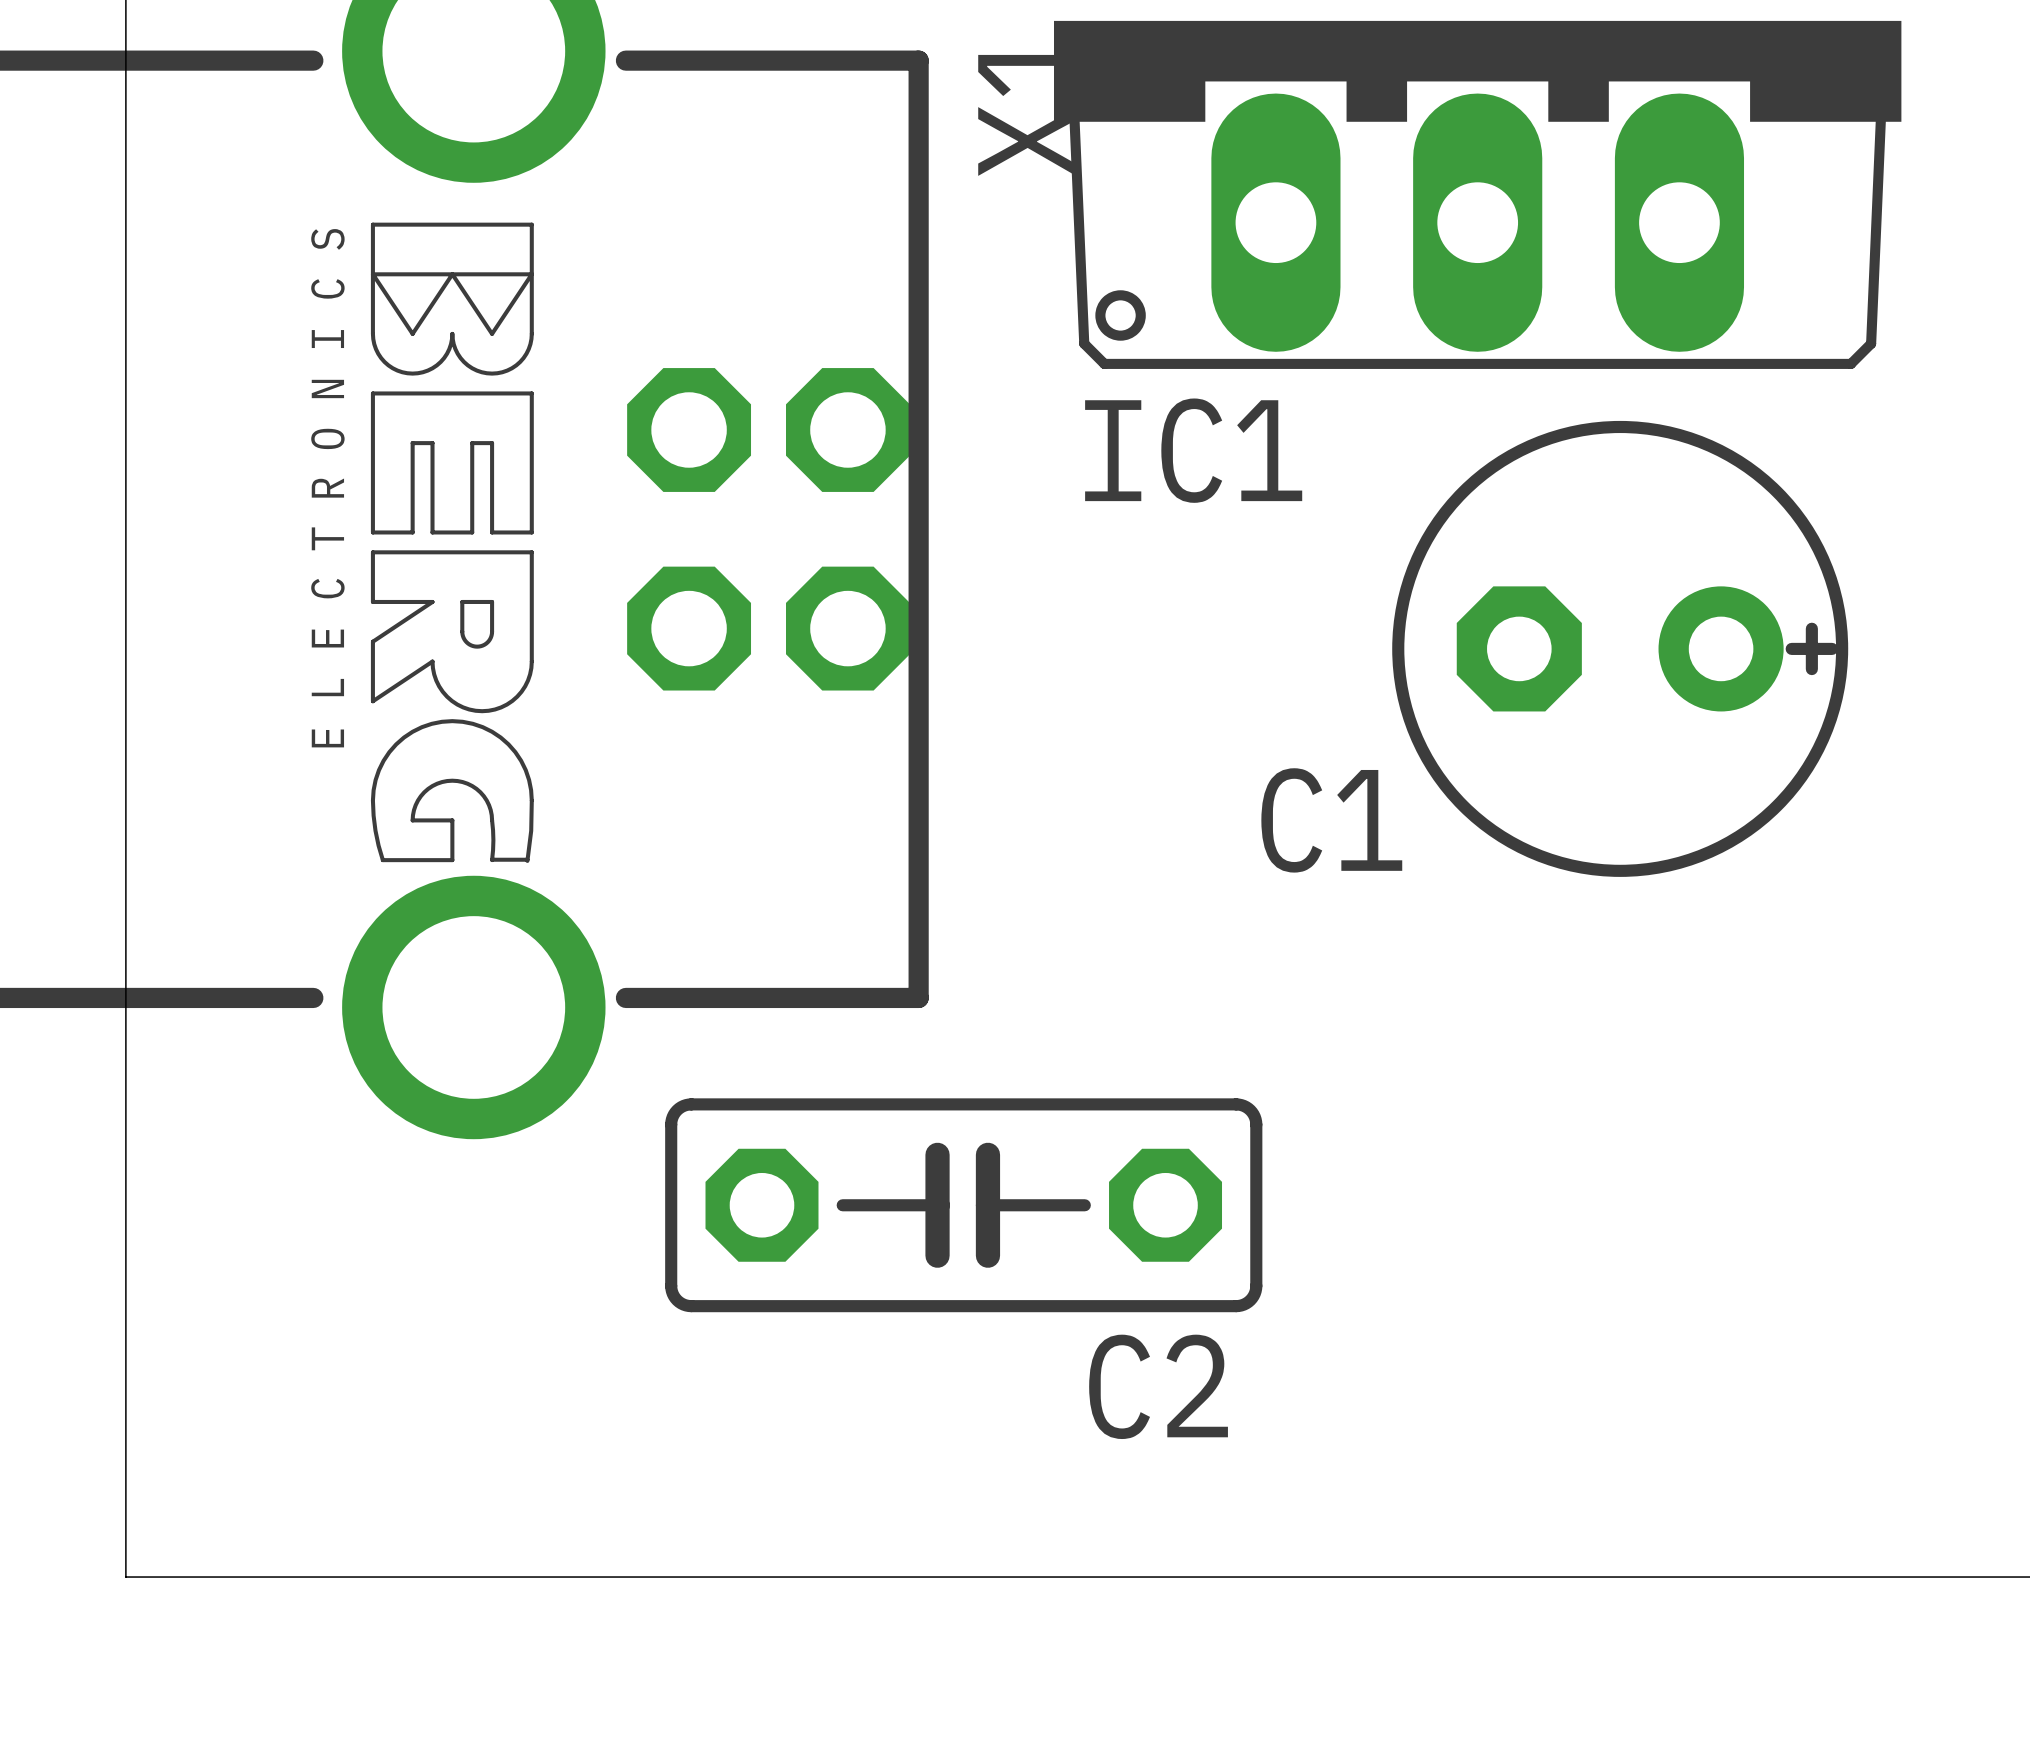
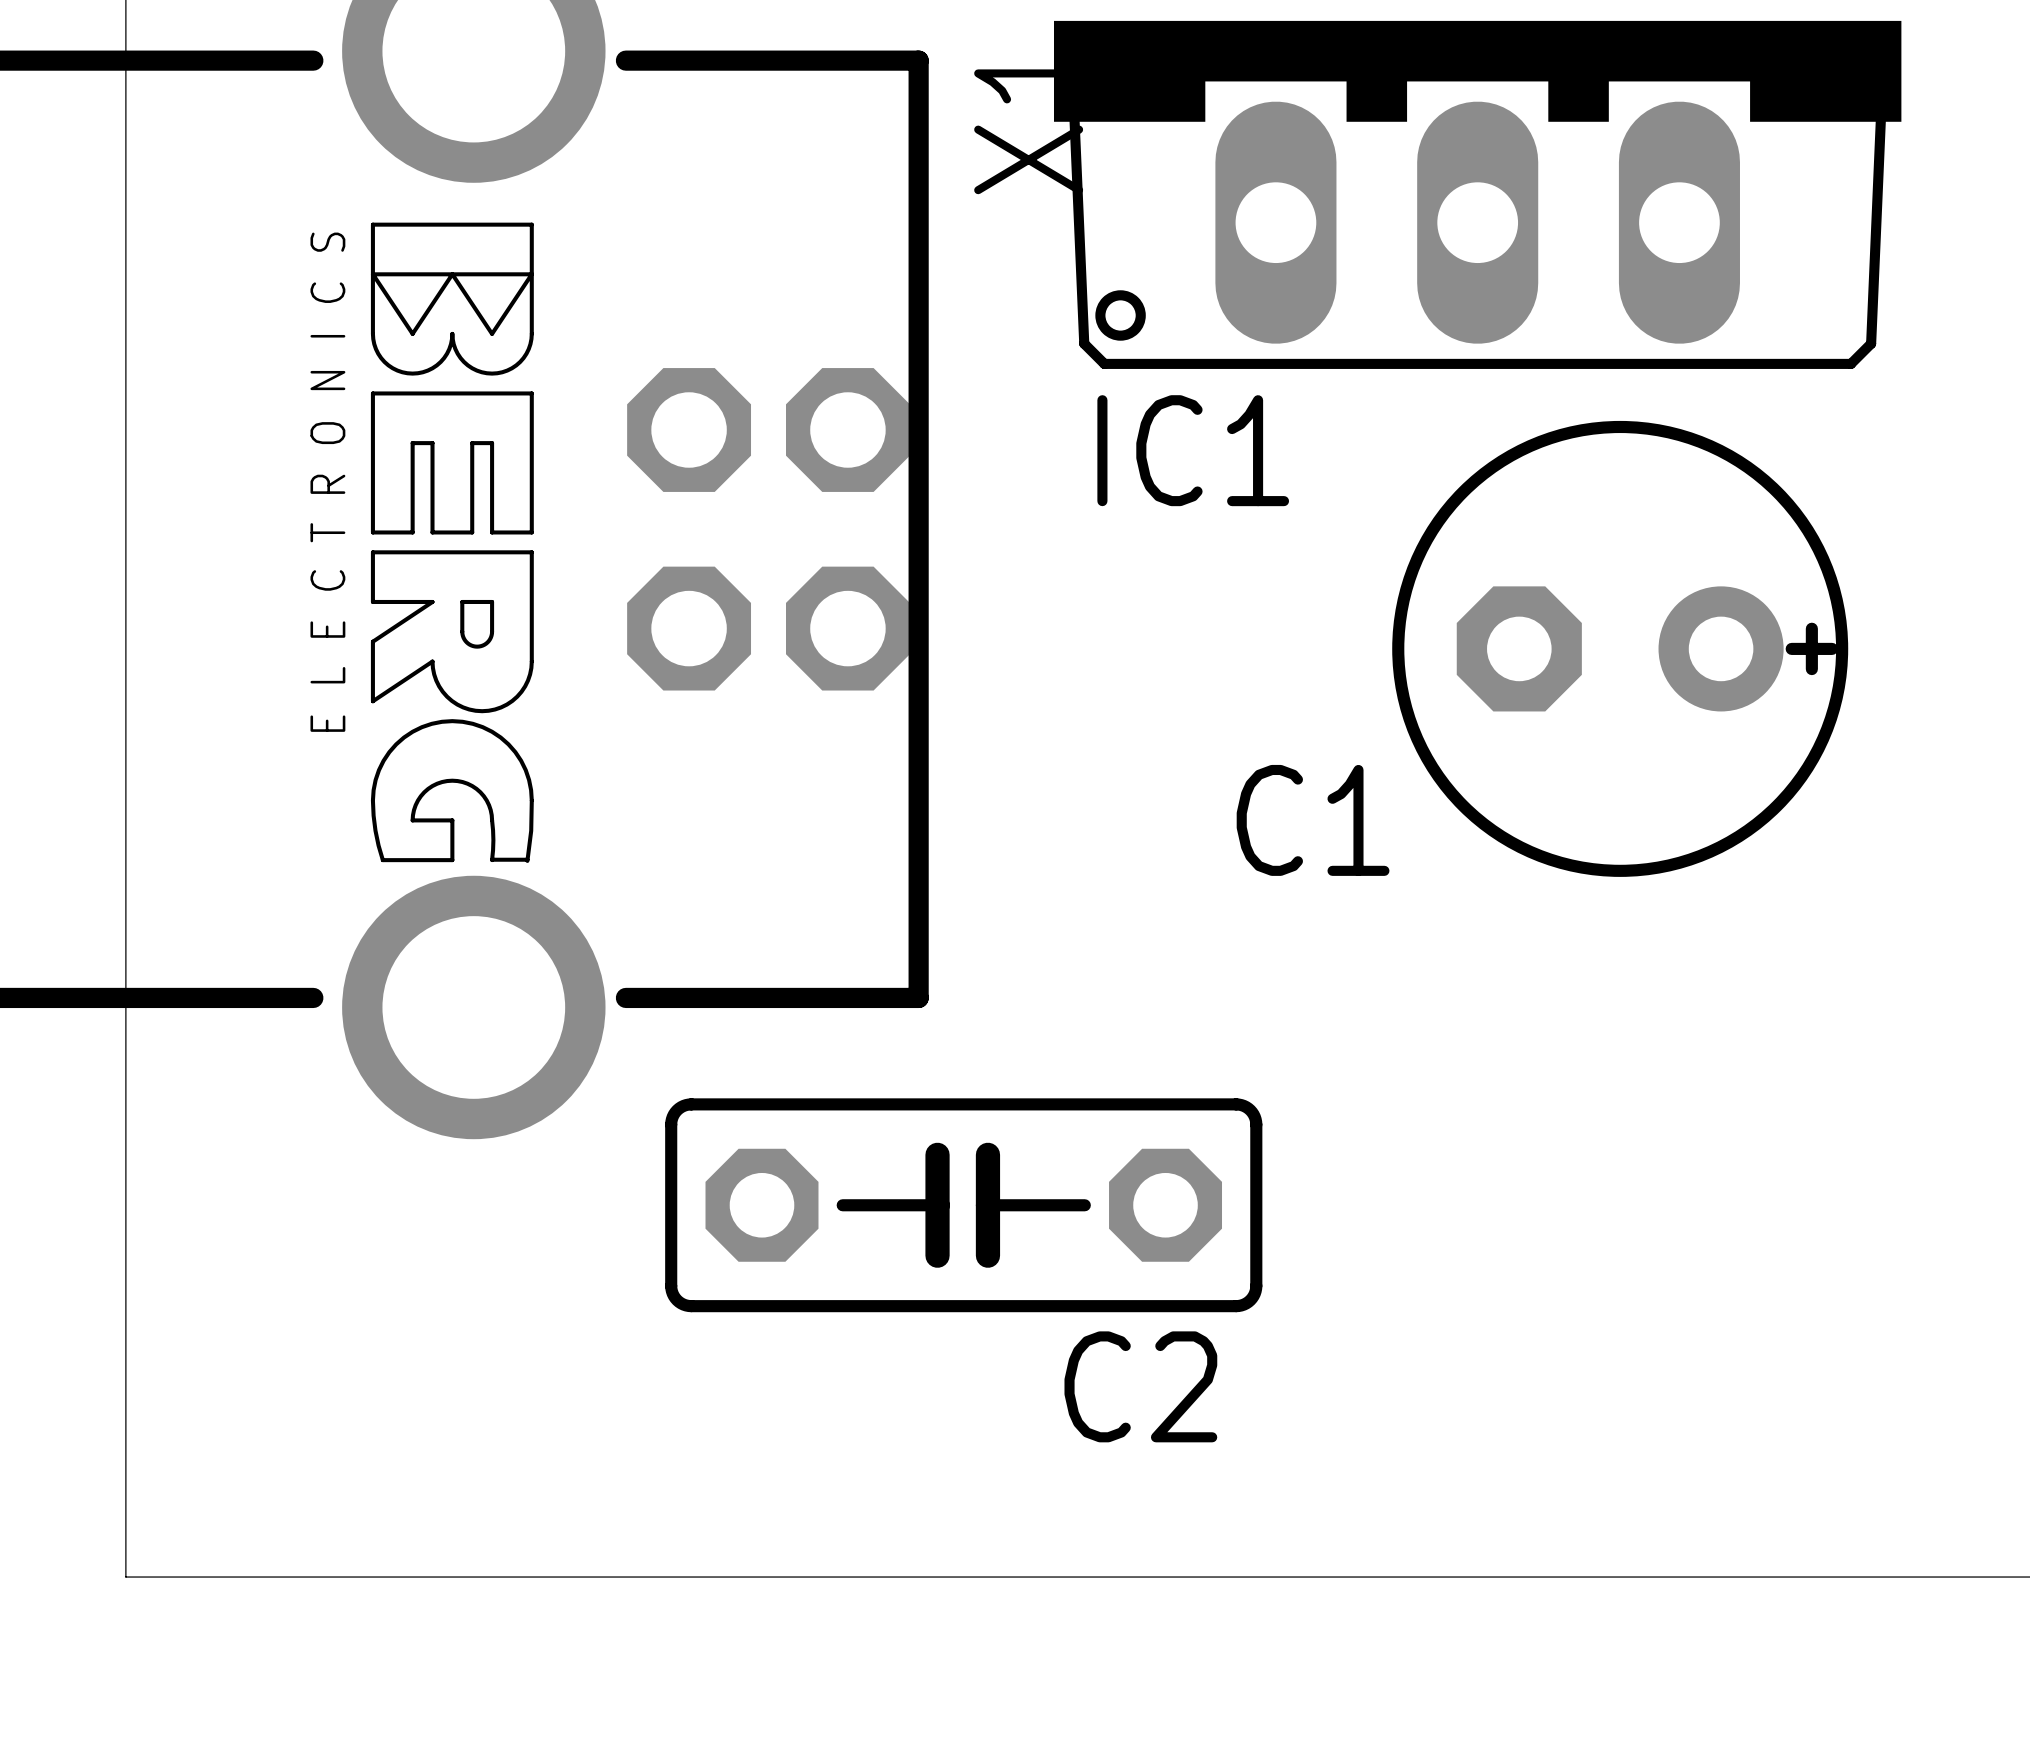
IC1 footprint: [1053, 20, 1902, 369] -> [1053, 20, 1902, 369]

